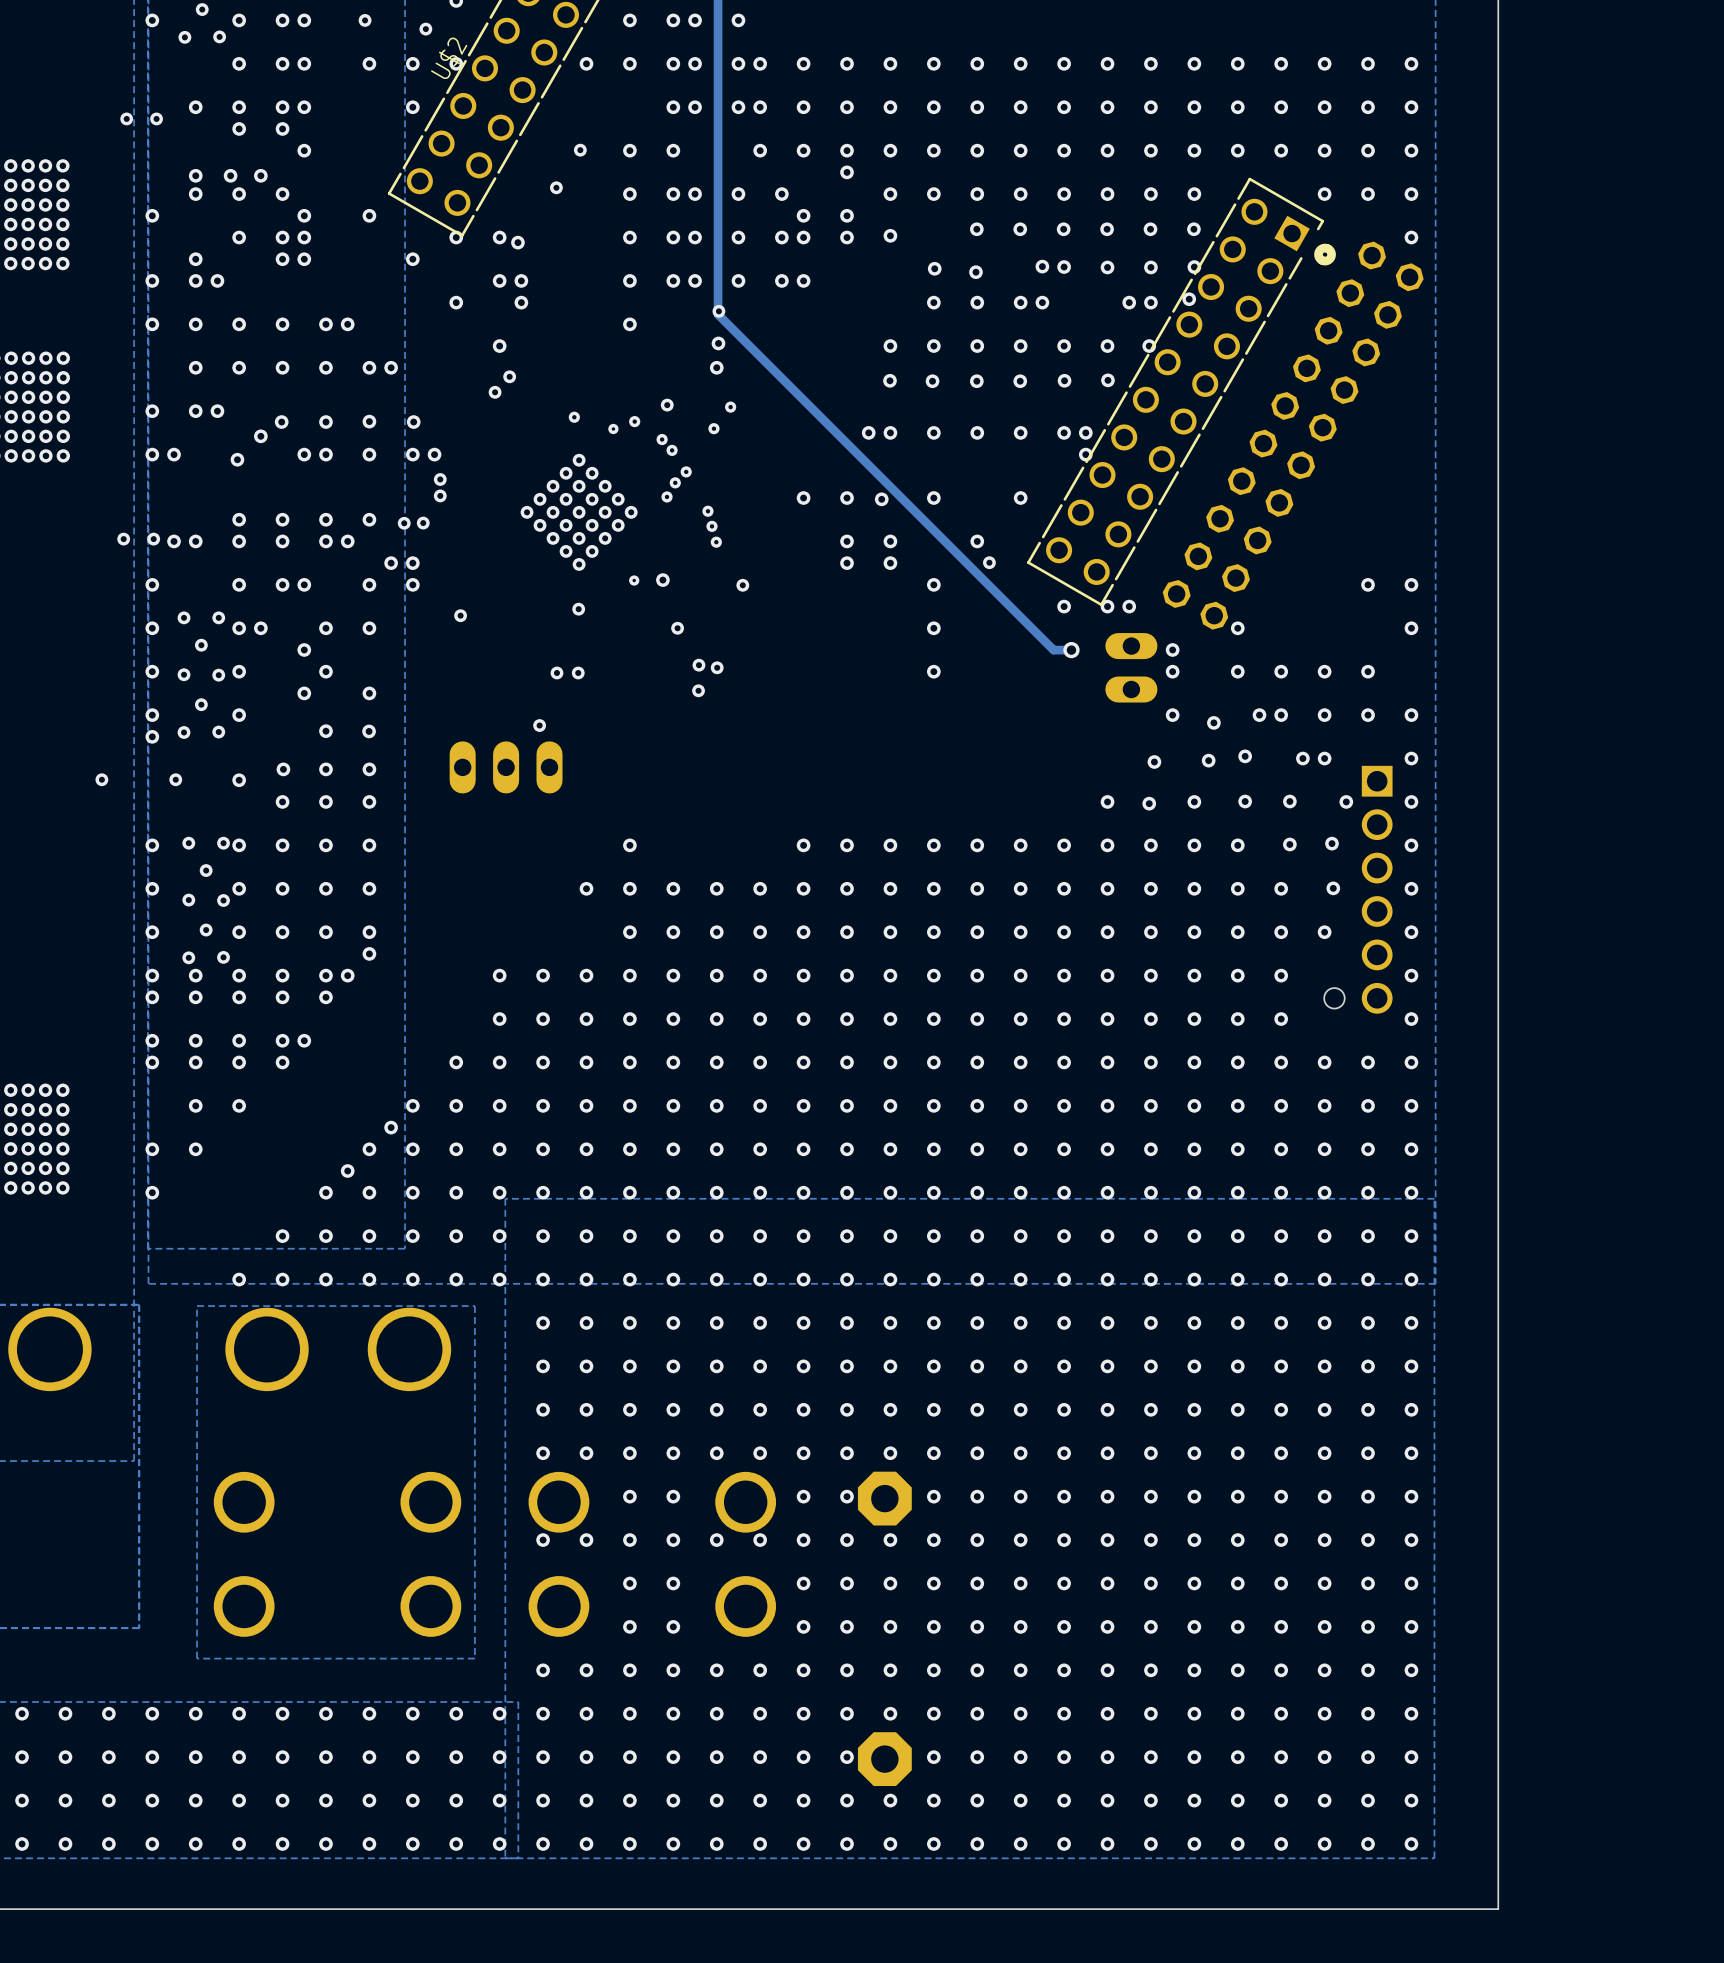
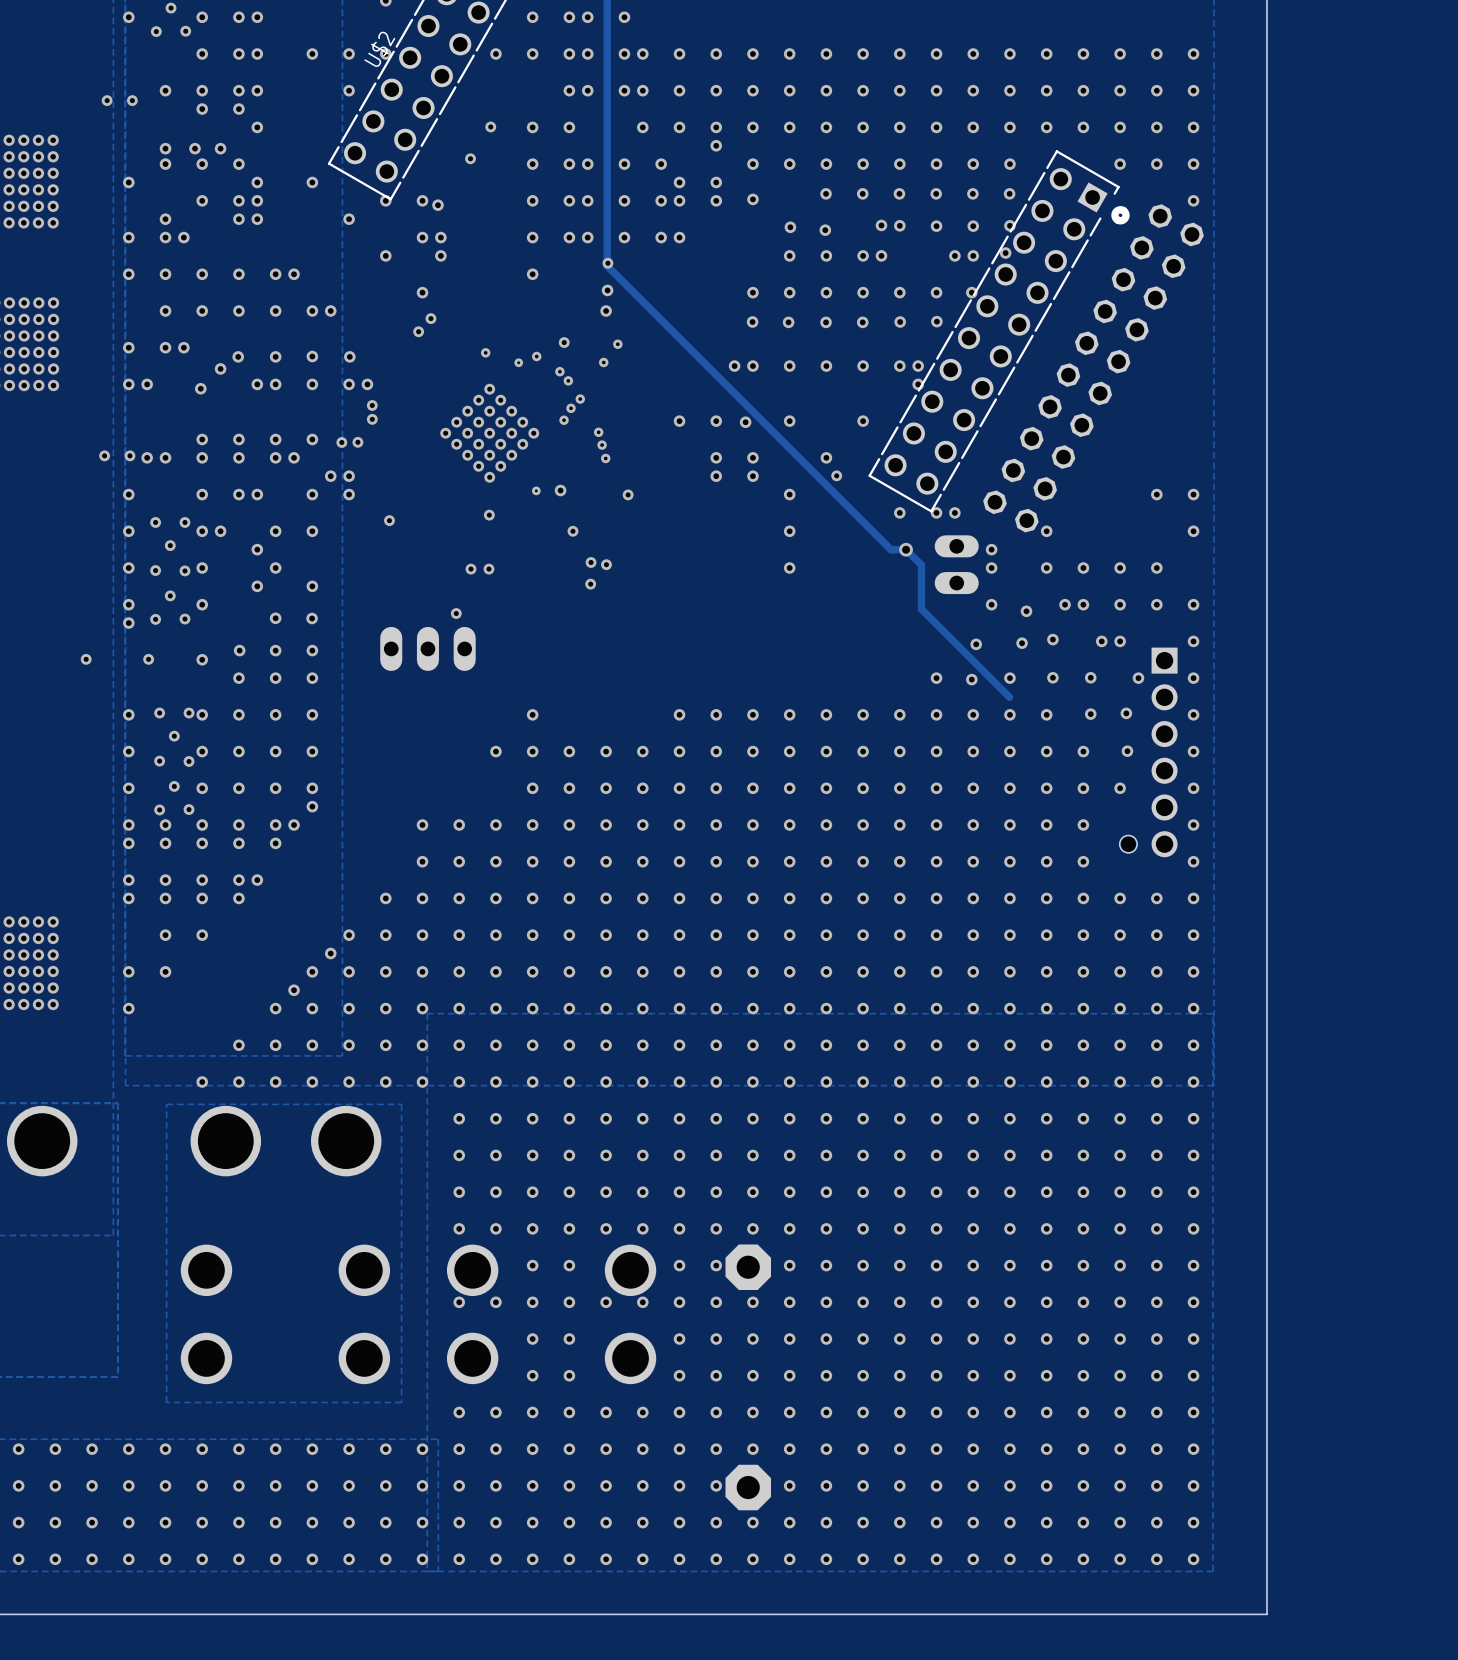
via: (365, 20) -> none
via: (425, 29) -> none
track: none -> (906, 549) (921, 565) (921, 609) (1009, 697)

